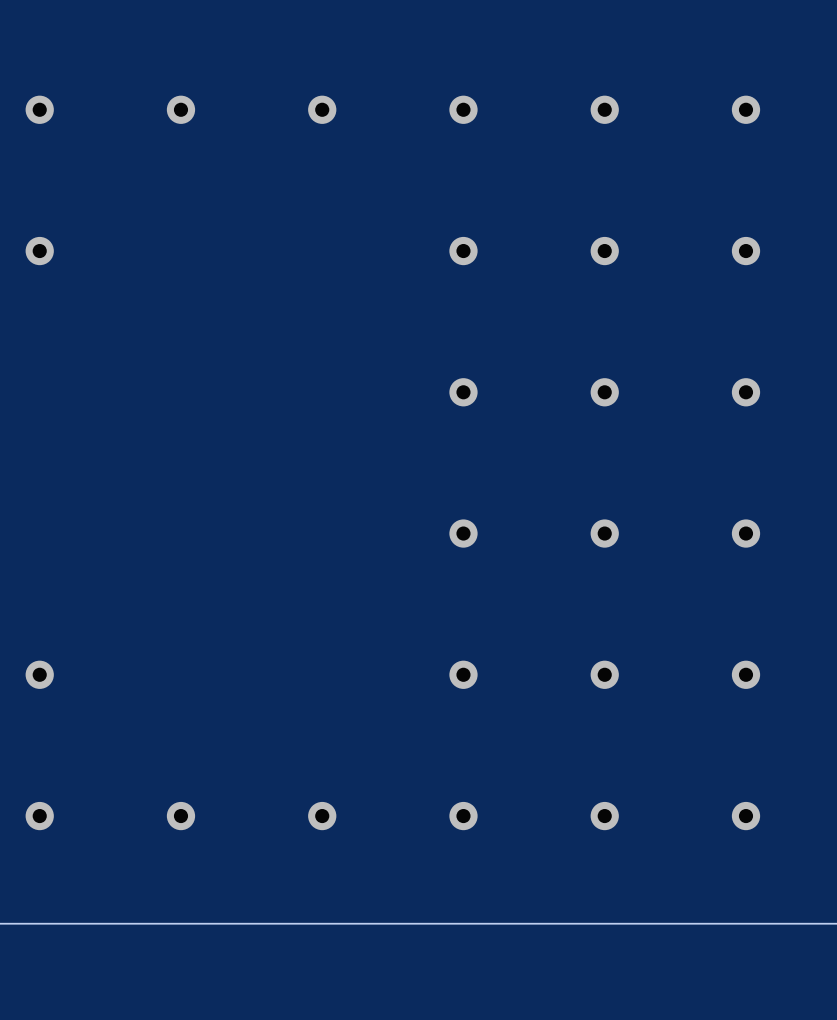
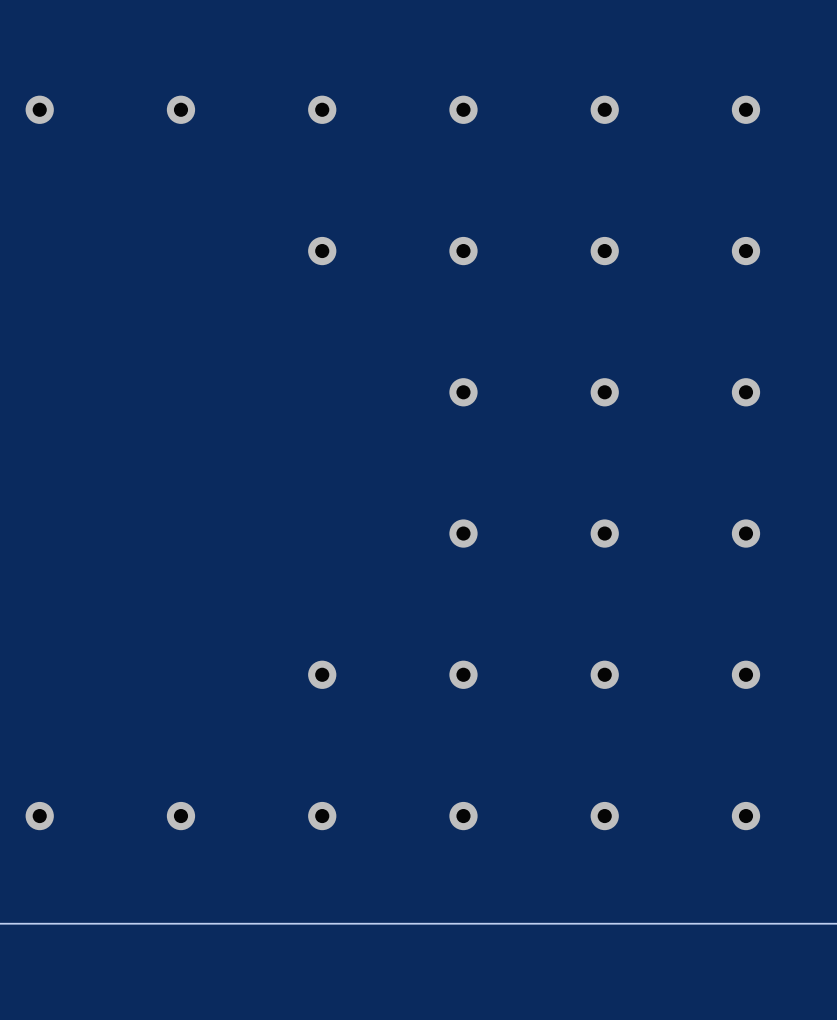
via: (39, 251) -> none
via: none -> (322, 251)
via: (39, 674) -> none
via: none -> (322, 674)

